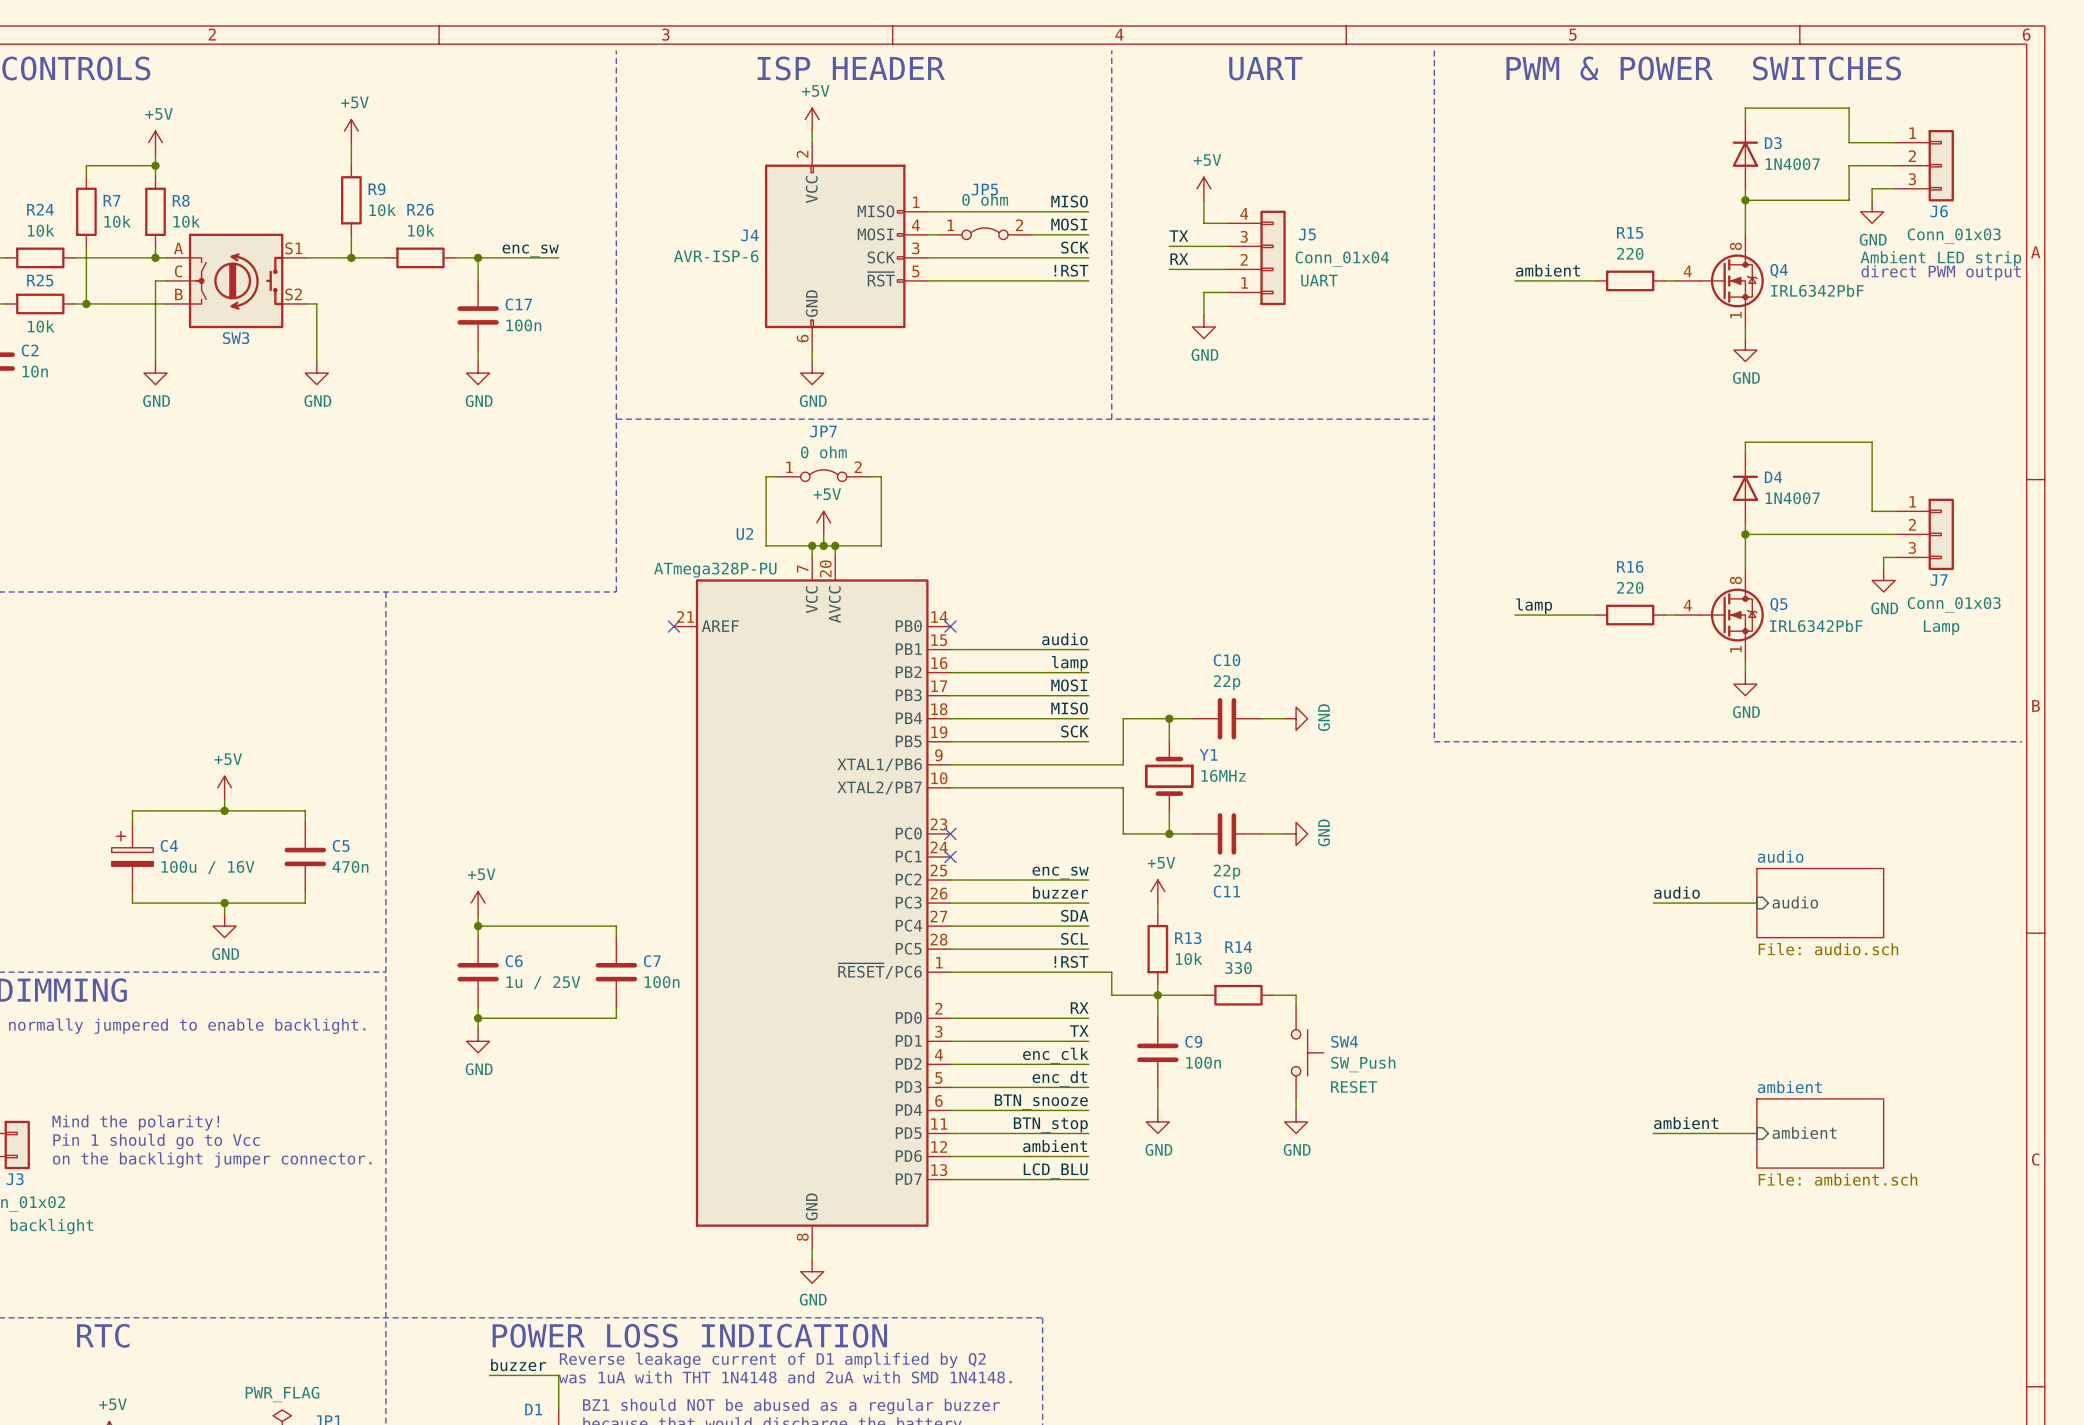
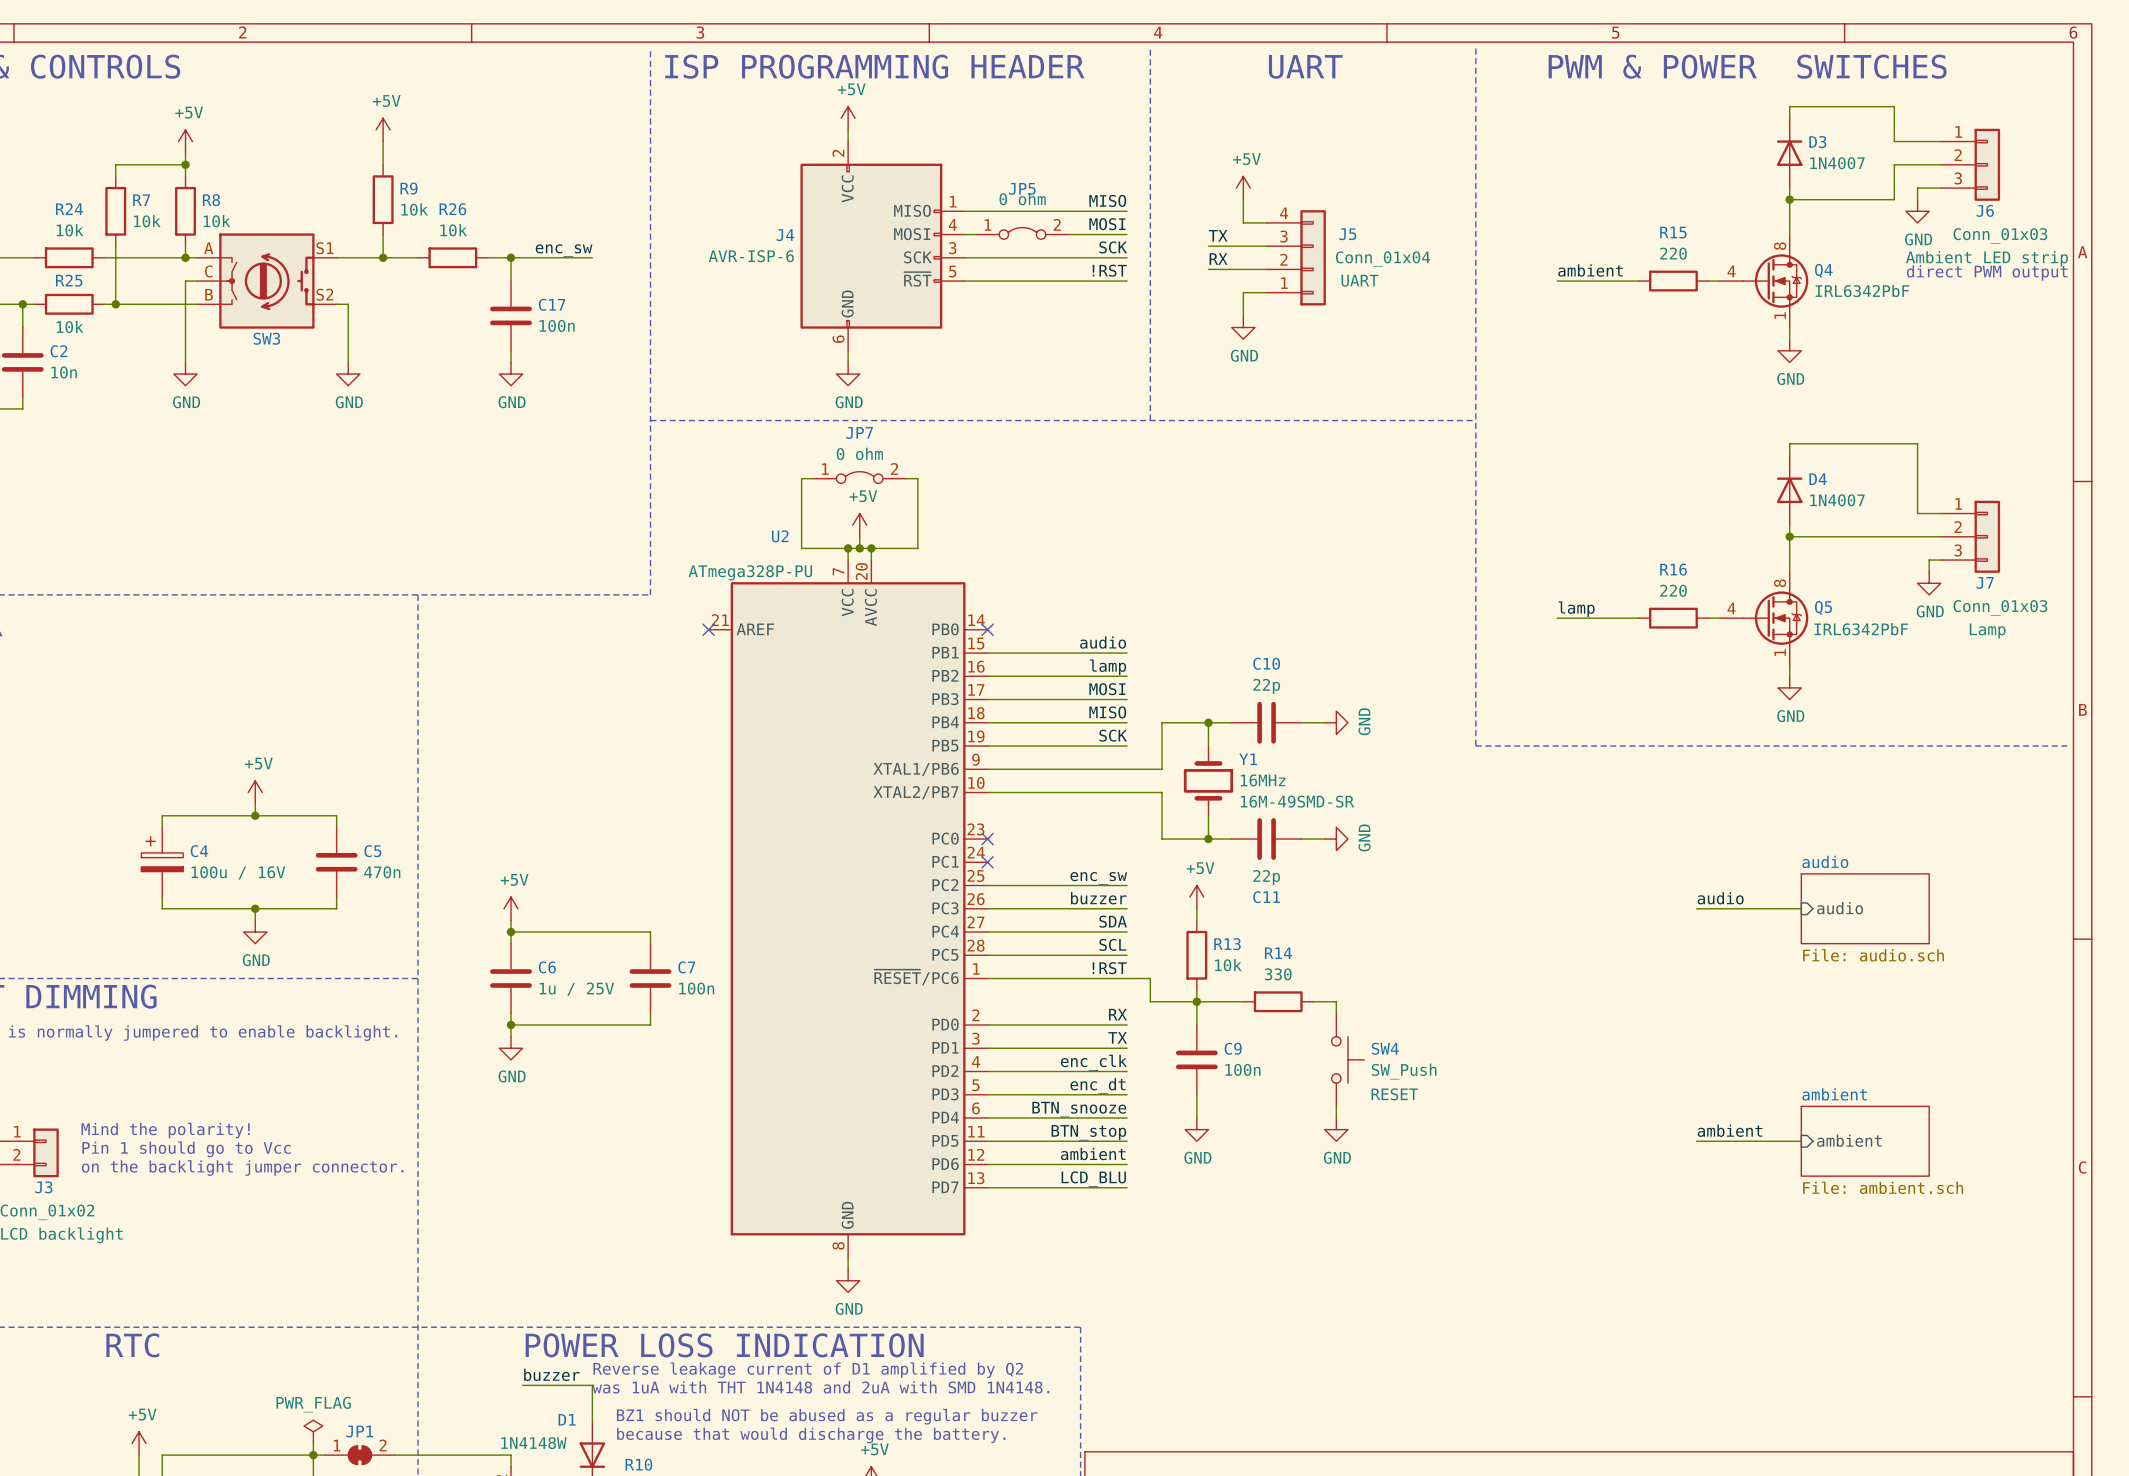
text: ISP HEADER (851, 68) -> ISP PROGRAMMING HEADER (874, 66)
Y1 text: none -> 16M-49SMD-SR (1297, 801)

